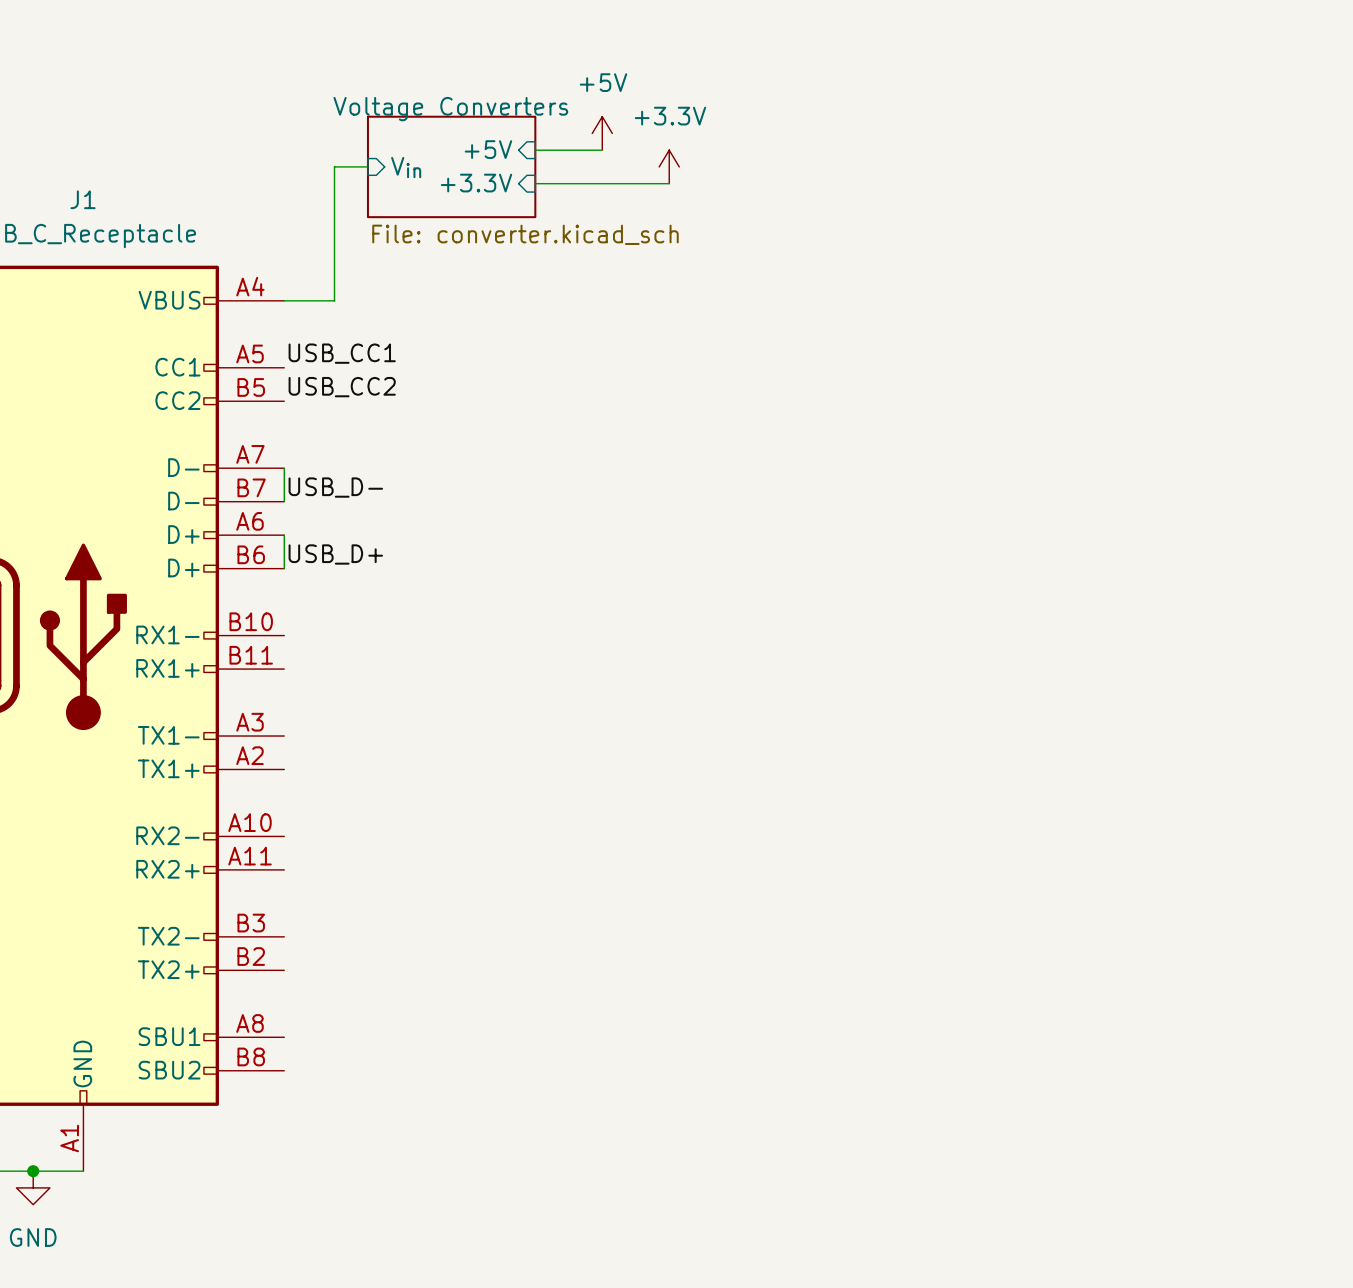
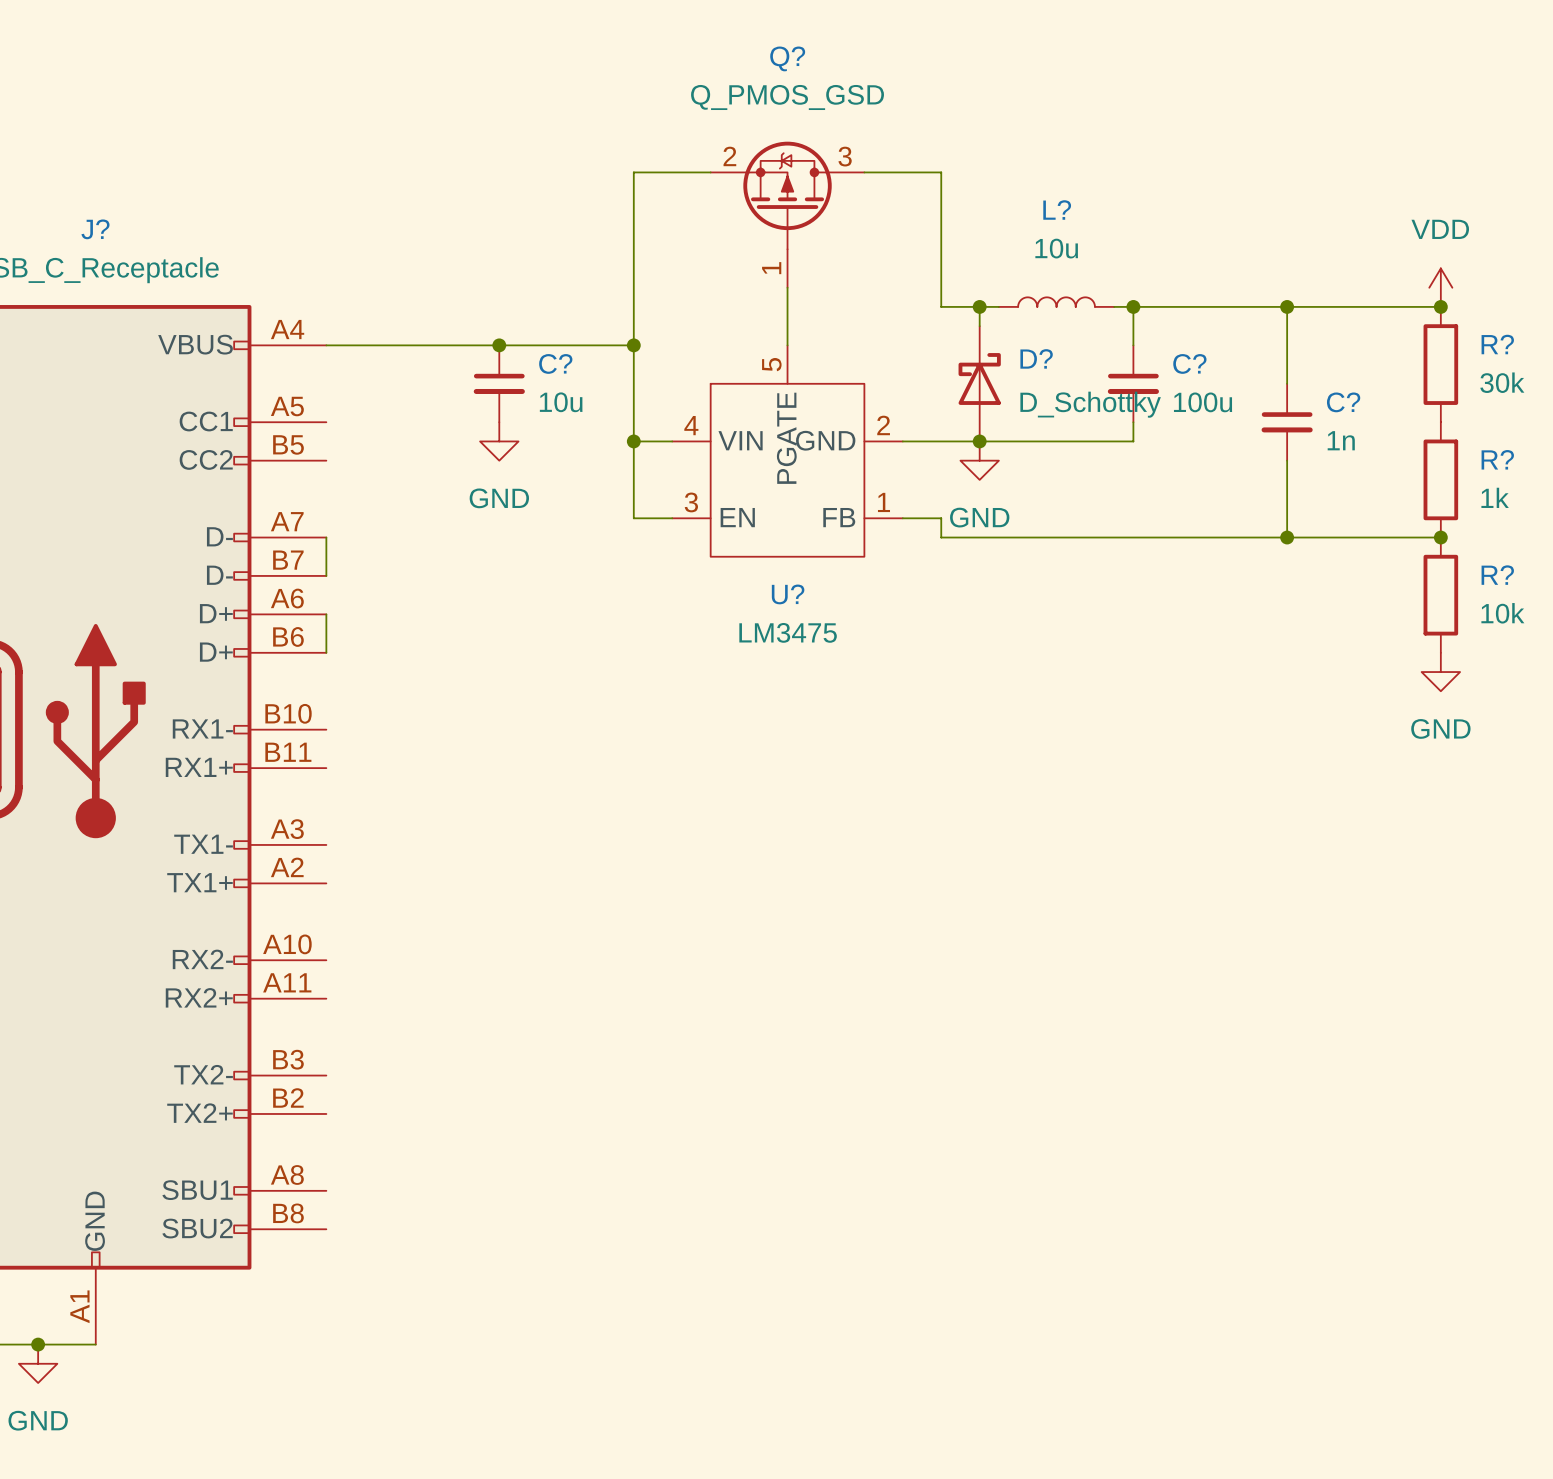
power symbol: +5V (602, 133) -> none
sheet pin: +5V (488, 149) -> none
wire: (535, 150) (552, 150) -> (672, 518) (633, 518) (633, 172)
wire: none -> (691, 172) (710, 172)
wire: none -> (864, 172) (941, 172) (941, 306) (998, 306)
wire: (367, 166) (334, 166) (334, 300) -> (633, 345) (384, 345)
sheet Voltage Converters: File: converter.kicad_sch (451, 166) -> none
power symbol: +3.3V (669, 166) -> none
sheet pin: Vin (406, 167) -> none
sheet pin: +3.3V (476, 183) -> none
wire: (535, 183) (669, 183) -> none
Q?: none -> Q_PMOS_GSD (787, 214)
J1 name: J1 (83, 199) -> J? (95, 229)
wire: none -> (787, 287) (787, 345)
power symbol: none -> VDD (1440, 287)
L?: none -> 10u (1056, 302)
wire: none -> (979, 306) (979, 326)
junction: none -> (979, 306)
wire: none -> (1114, 306) (1440, 306)
wire: none -> (1133, 306) (1133, 345)
junction: none -> (1133, 306)
wire: none -> (1287, 306) (1287, 383)
junction: none -> (1287, 306)
junction: none -> (1440, 306)
junction: none -> (499, 345)
junction: none -> (633, 345)
R?: none -> 30k (1440, 364)
C?: none -> 10u (499, 383)
D?: none -> D_Schottky (979, 383)
C?: none -> 100u (1133, 383)
label: USB_CC1 (342, 353) -> none
wire: none -> (1133, 422) (1133, 441) (902, 441)
C?: none -> 1n (1287, 422)
power symbol: none -> GND (499, 441)
wire: none -> (633, 441) (672, 441)
junction: none -> (633, 441)
junction: none -> (979, 441)
label: USB_CC2 (342, 387) -> none
U?: none -> LM3475 (787, 451)
power symbol: none -> GND (979, 460)
wire: none -> (1287, 460) (1287, 537)
R?: none -> 1k (1440, 479)
wire: none -> (902, 518) (941, 518) (941, 537) (1440, 537)
junction: none -> (1287, 537)
junction: none -> (1440, 537)
label: USB_D- (335, 487) -> none
R?: none -> 10k (1440, 595)
label: USB_D+ (335, 554) -> none
power symbol: none -> GND (1440, 672)

